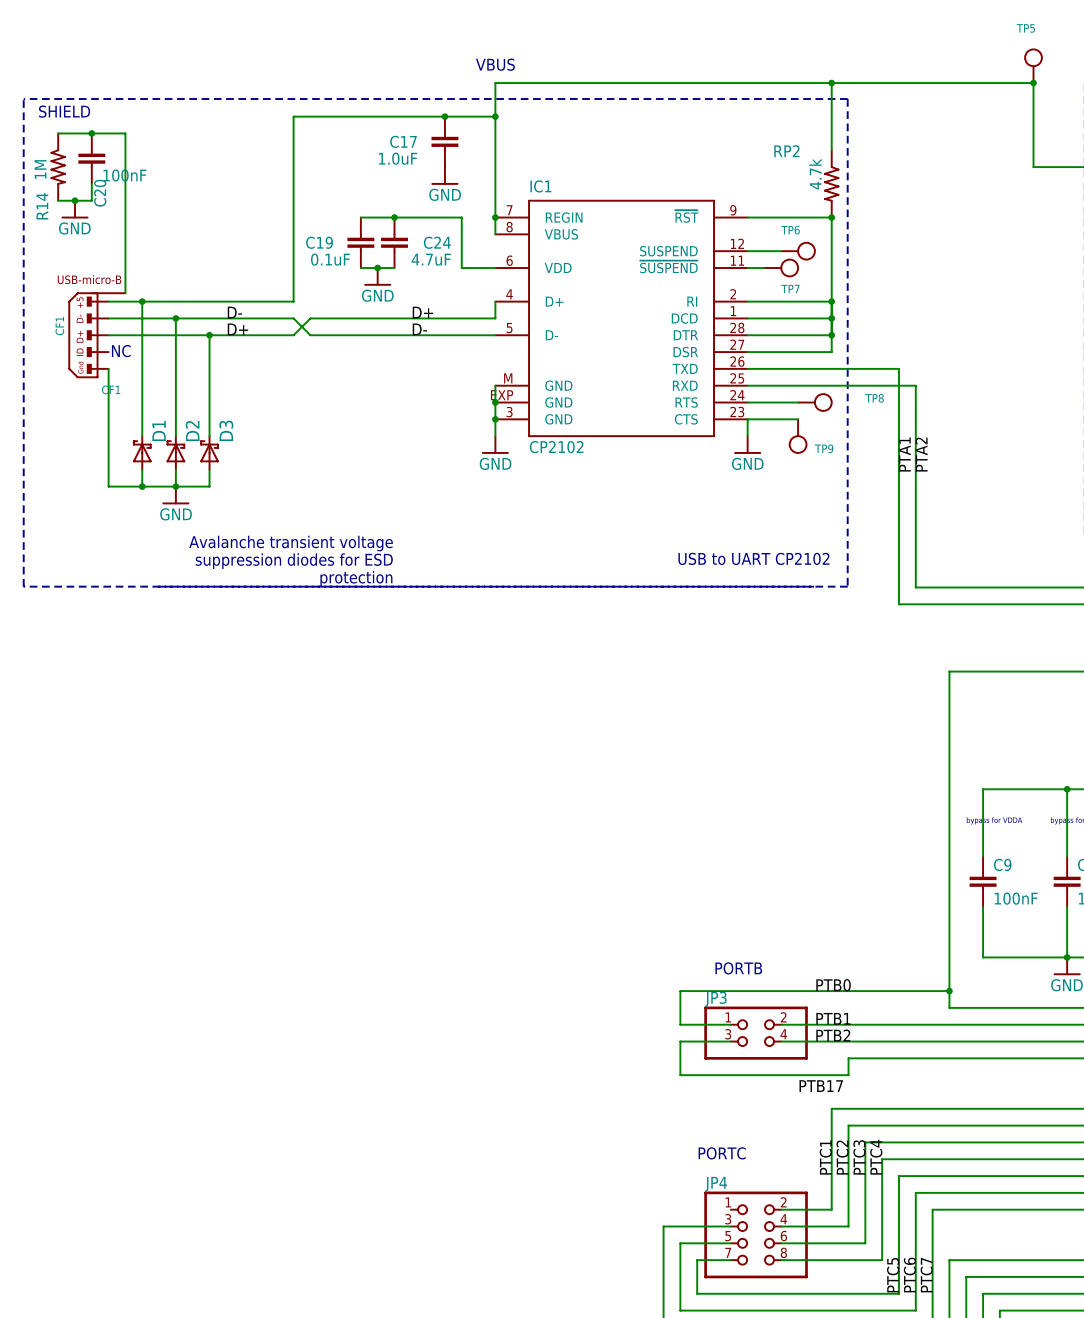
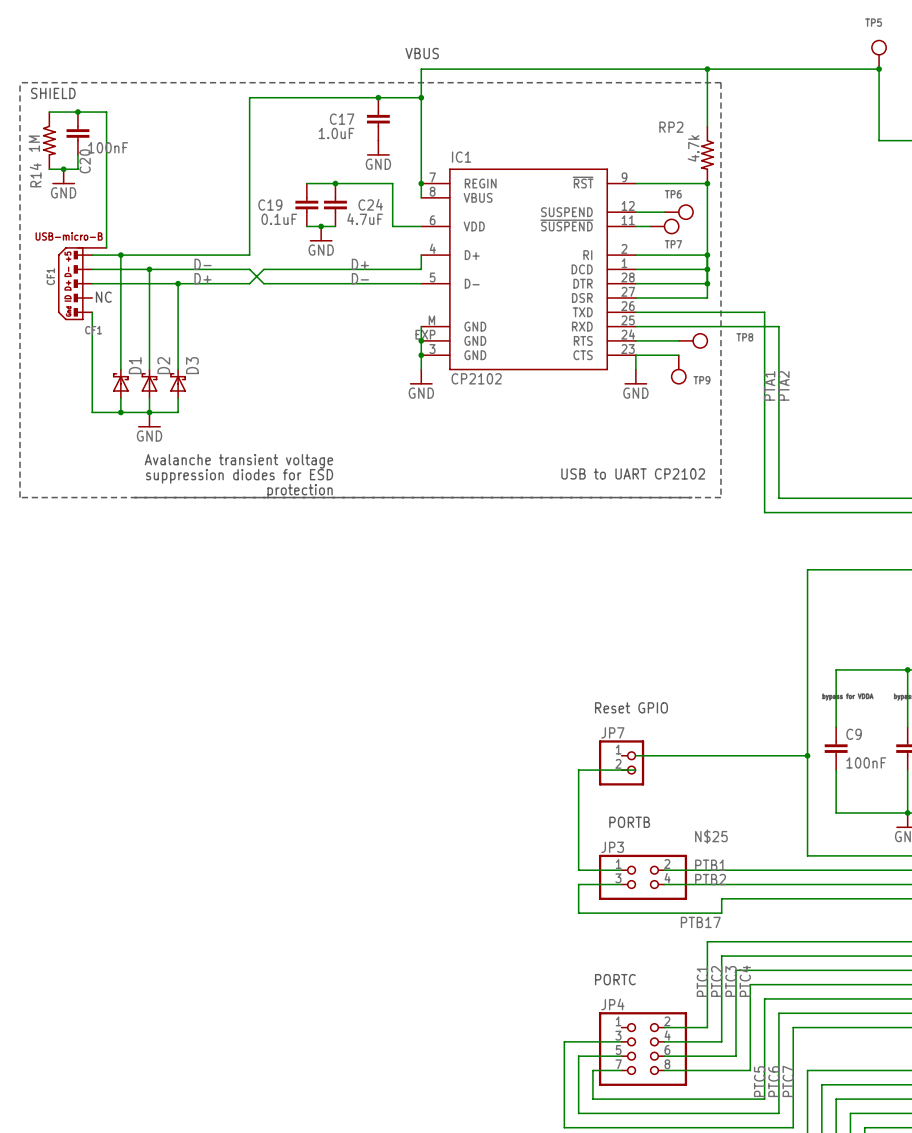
text: none -> Reset GPIO (631, 707)
wire: none -> (635, 755) (807, 755)
junction: none -> (807, 755)
JP7: none -> (621, 762)
label: PTB0 (833, 985) -> N$25 (711, 836)
wire: (680, 991) (949, 991) -> (578, 841) (578, 770) (635, 770)
junction: (949, 991) -> none

